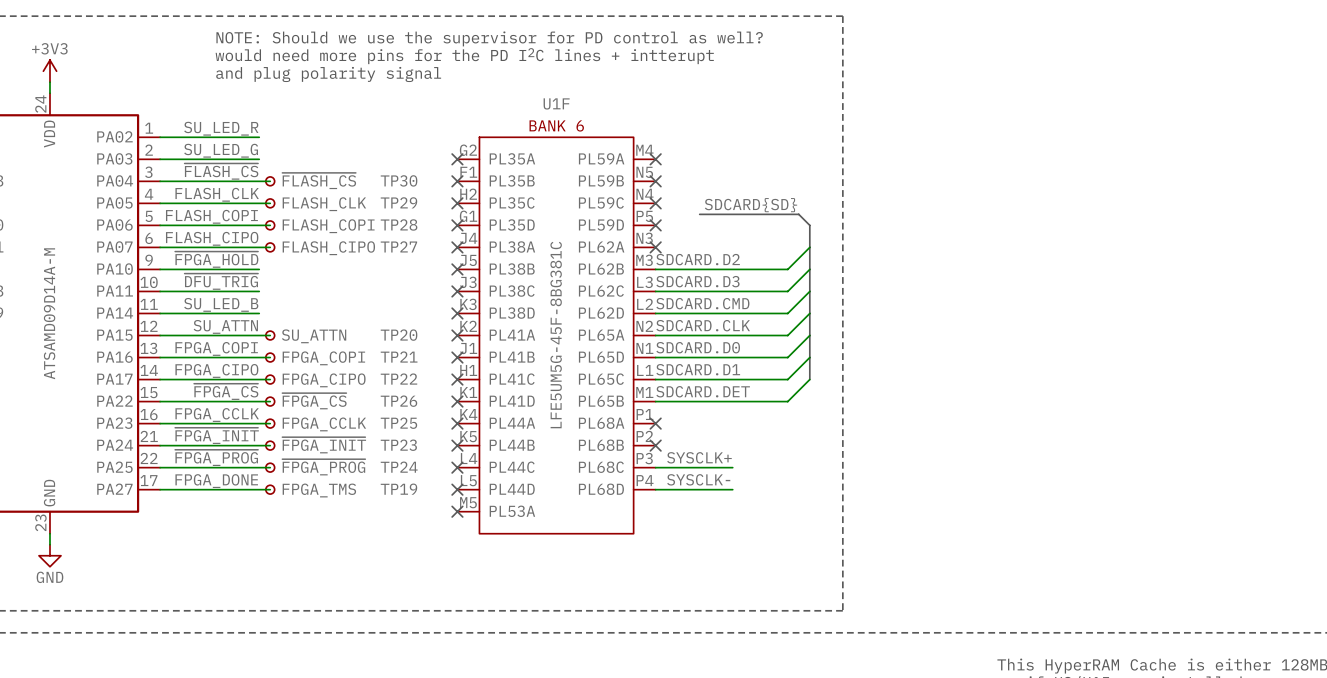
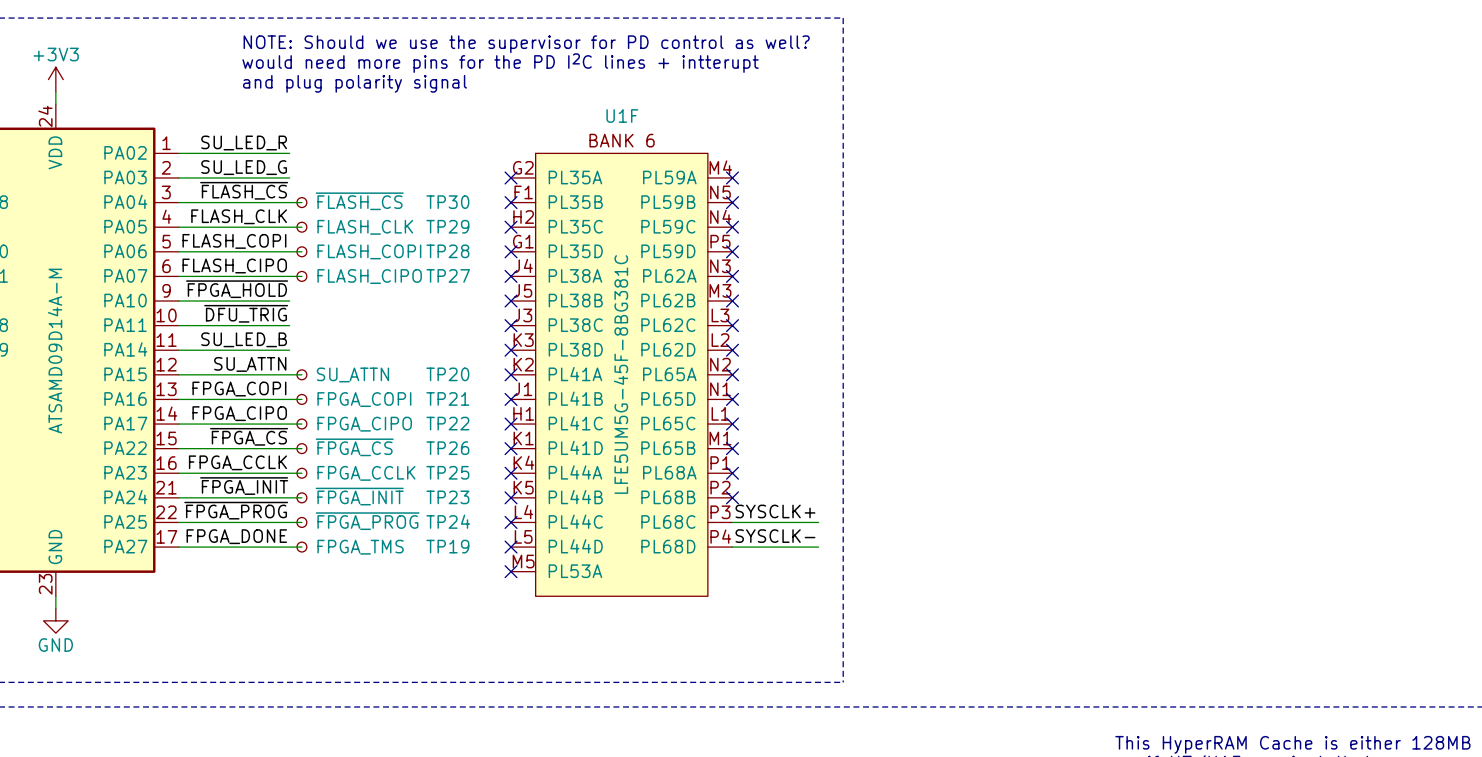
line: (754, 16) (842, 16) (842, 610) (754, 610) -> (843, 18) (843, 682)
label: SDCARD{SD} (751, 205) -> none
bus: (699, 214) (798, 214) (809, 225) (809, 379) -> none
wire: (809, 247) (787, 269) (655, 269) -> none
label: SDCARD.D2 (698, 259) -> none
no-connect mark: none -> (732, 301)
wire: (809, 269) (787, 291) (655, 291) -> none
label: SDCARD.D3 (697, 281) -> none
no-connect mark: none -> (732, 325)
wire: (809, 291) (787, 313) (655, 313) -> none
label: SDCARD.CMD (702, 303) -> none
no-connect mark: none -> (732, 350)
wire: (809, 313) (787, 335) (655, 335) -> none
label: SDCARD.CLK (703, 325) -> none
no-connect mark: none -> (732, 374)
wire: (809, 335) (787, 357) (655, 357) -> none
label: SDCARD.D0 (698, 347) -> none
no-connect mark: none -> (732, 399)
wire: (809, 357) (787, 379) (655, 379) -> none
label: SDCARD.D1 (698, 369) -> none
no-connect mark: none -> (732, 424)
wire: (809, 379) (787, 401) (655, 401) -> none
label: SDCARD.DET (703, 391) -> none
no-connect mark: none -> (732, 448)

